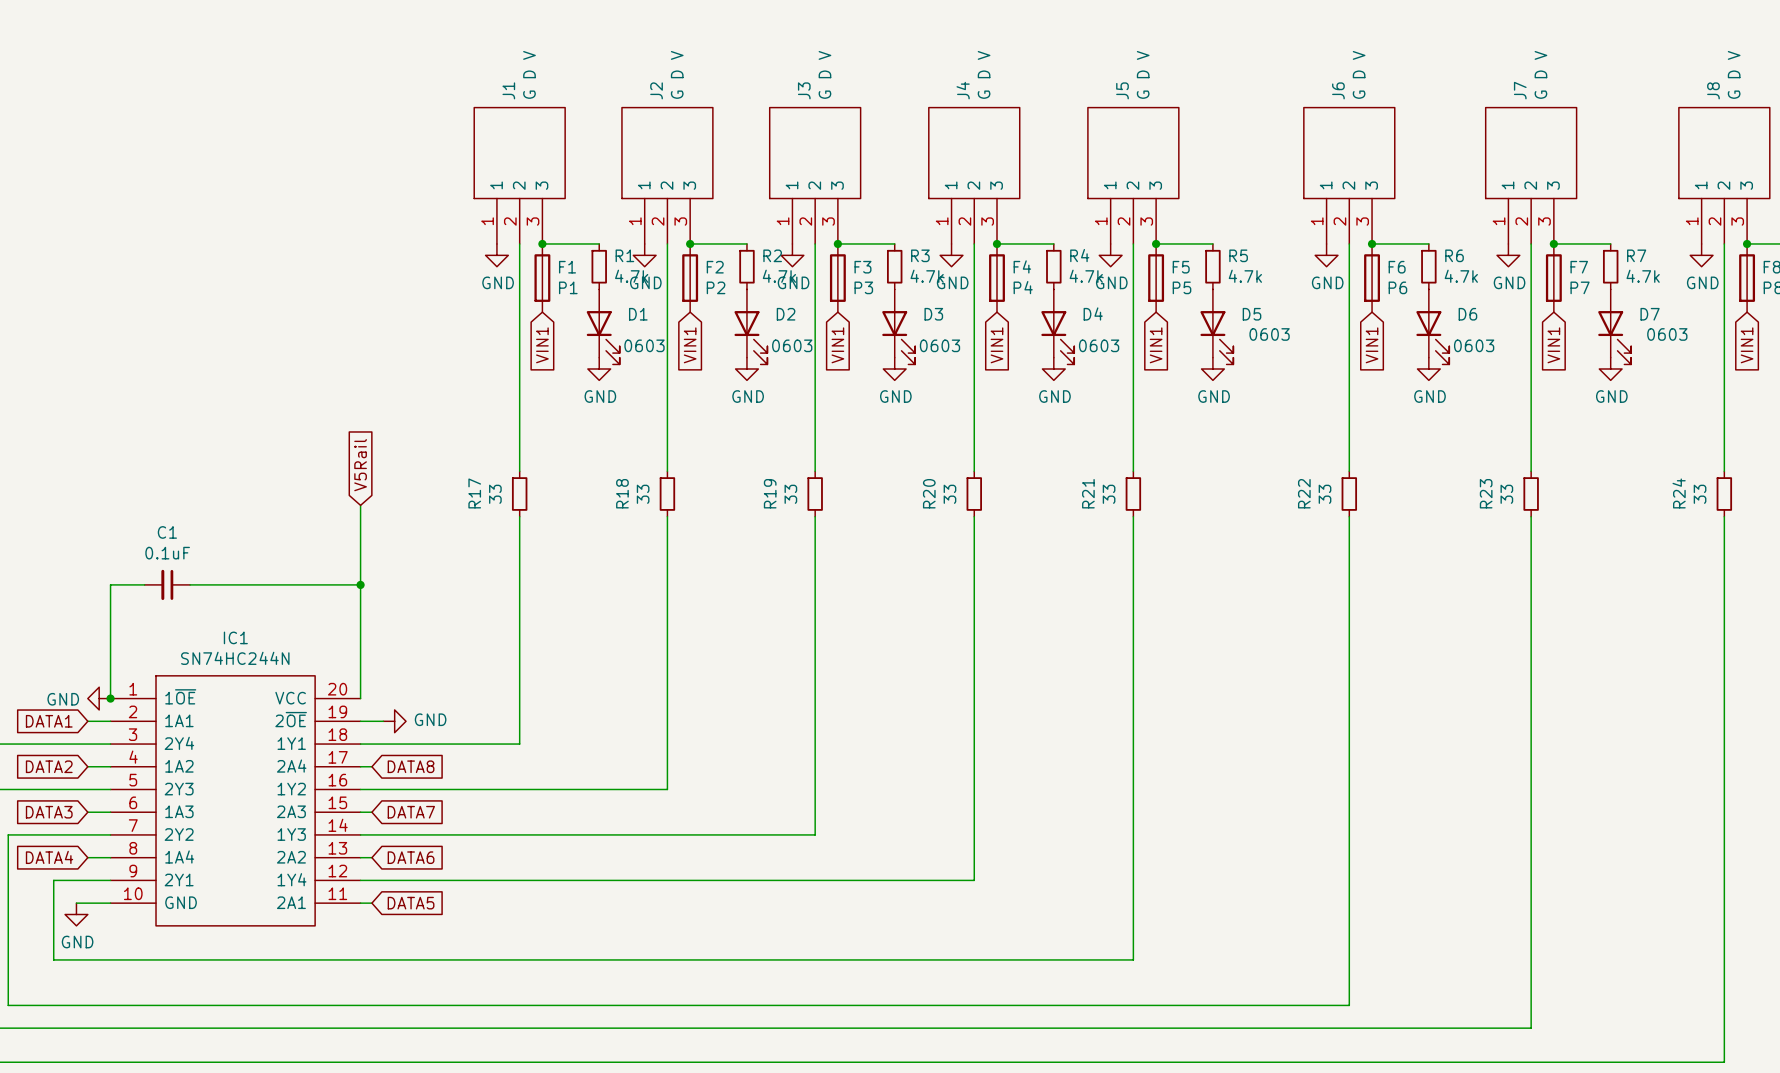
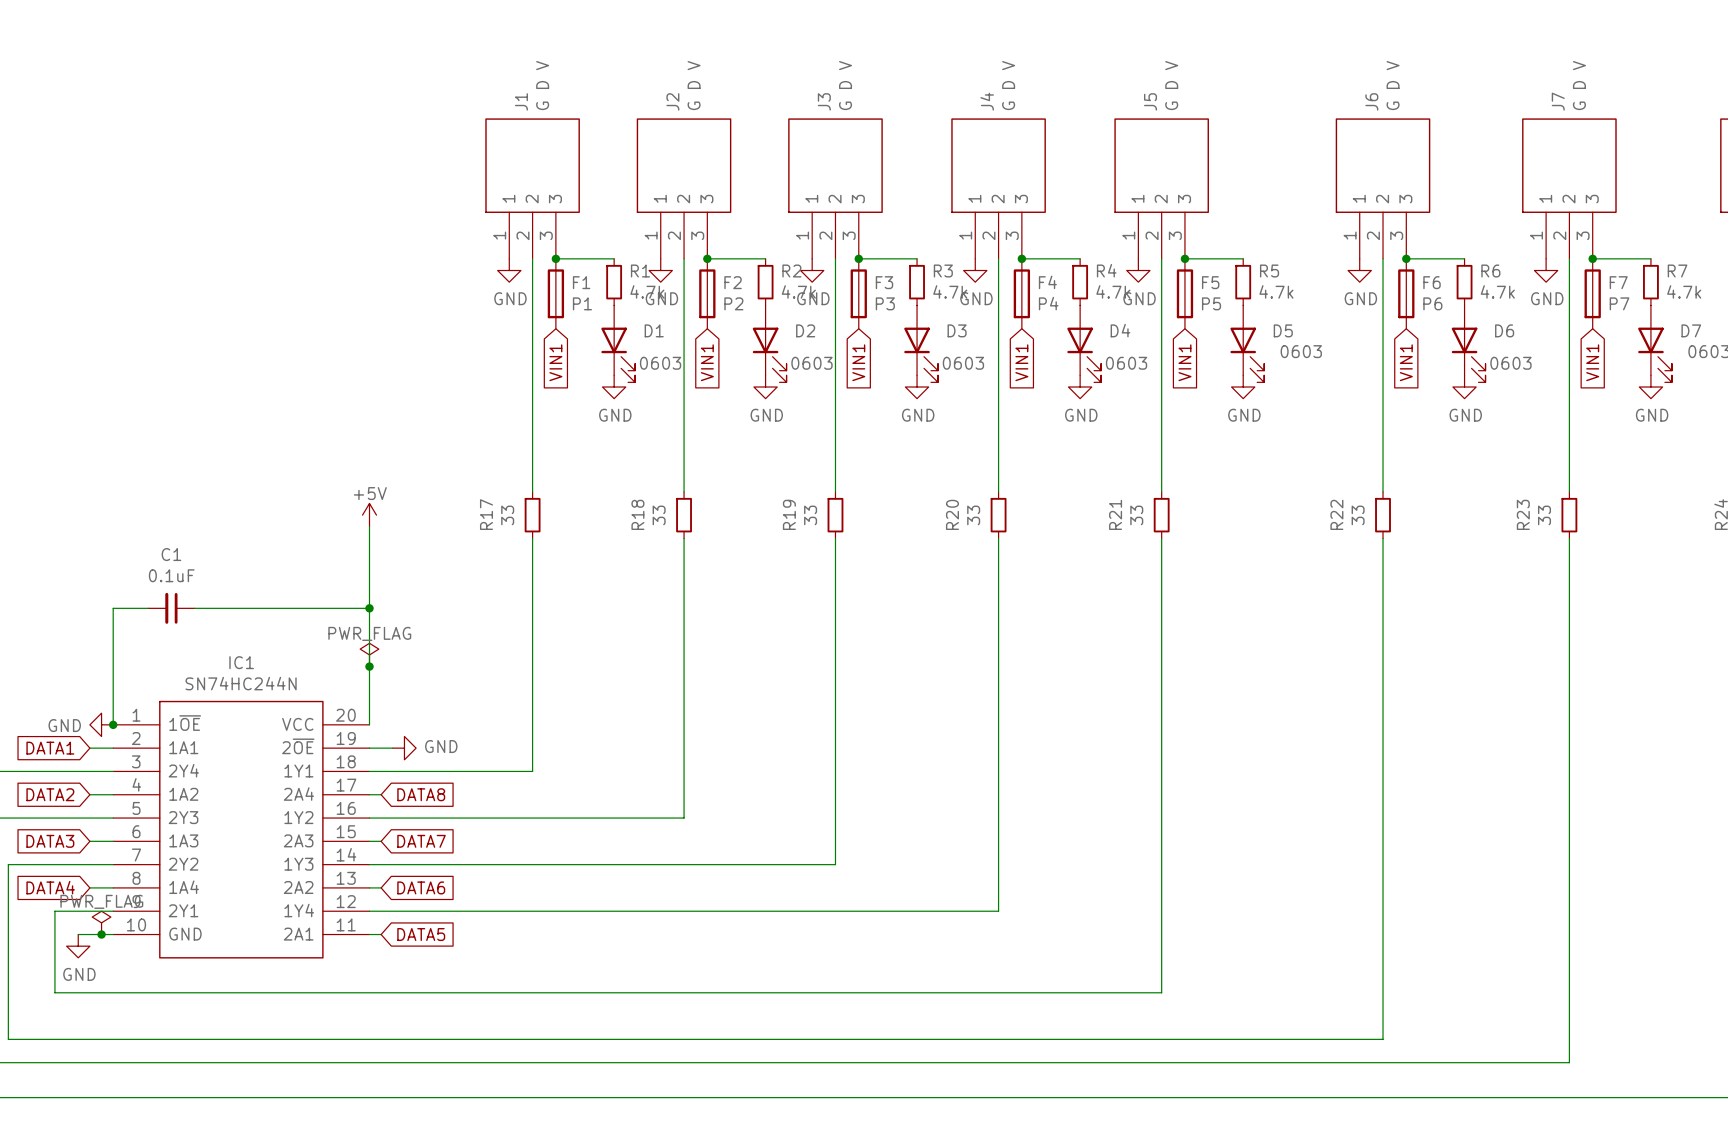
global label: V5Rail (360, 465) -> none
power symbol: none -> +5V (369, 515)
power symbol: none -> PWR_FLAG (369, 654)
junction: none -> (369, 666)
power symbol: none -> PWR_FLAG (101, 922)
junction: none -> (101, 934)

